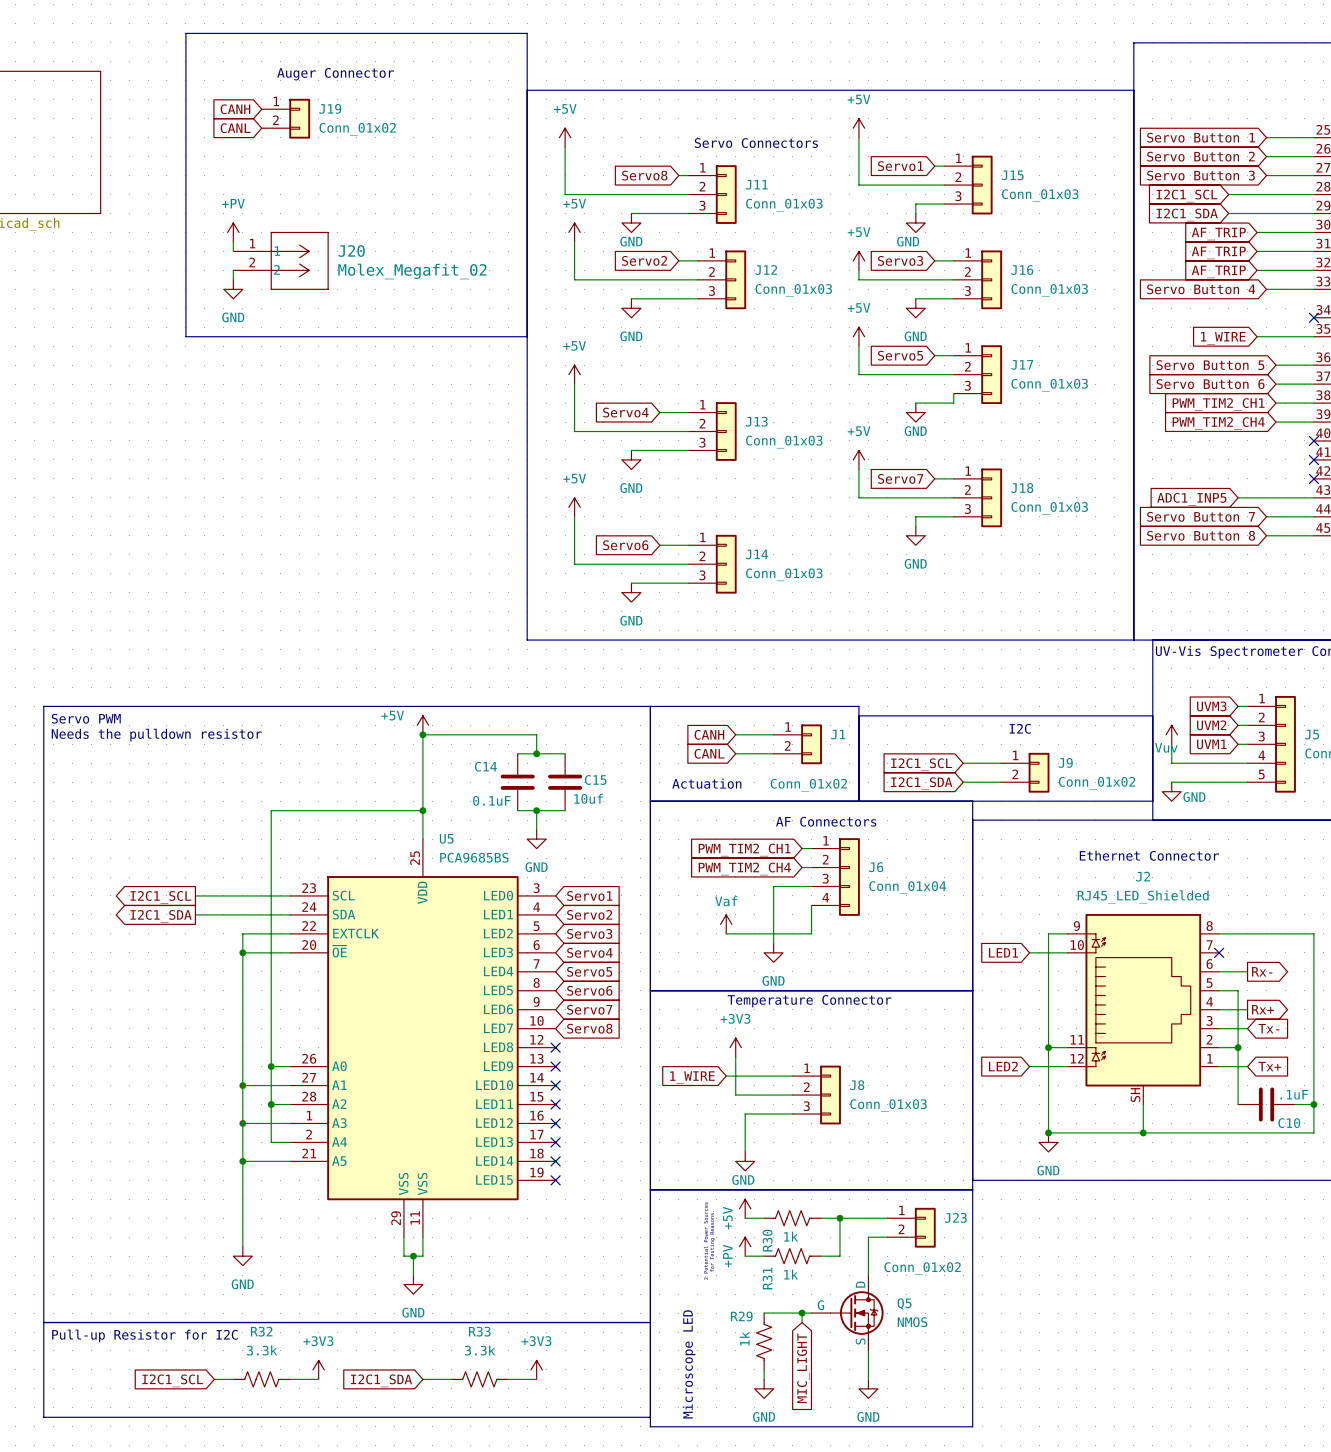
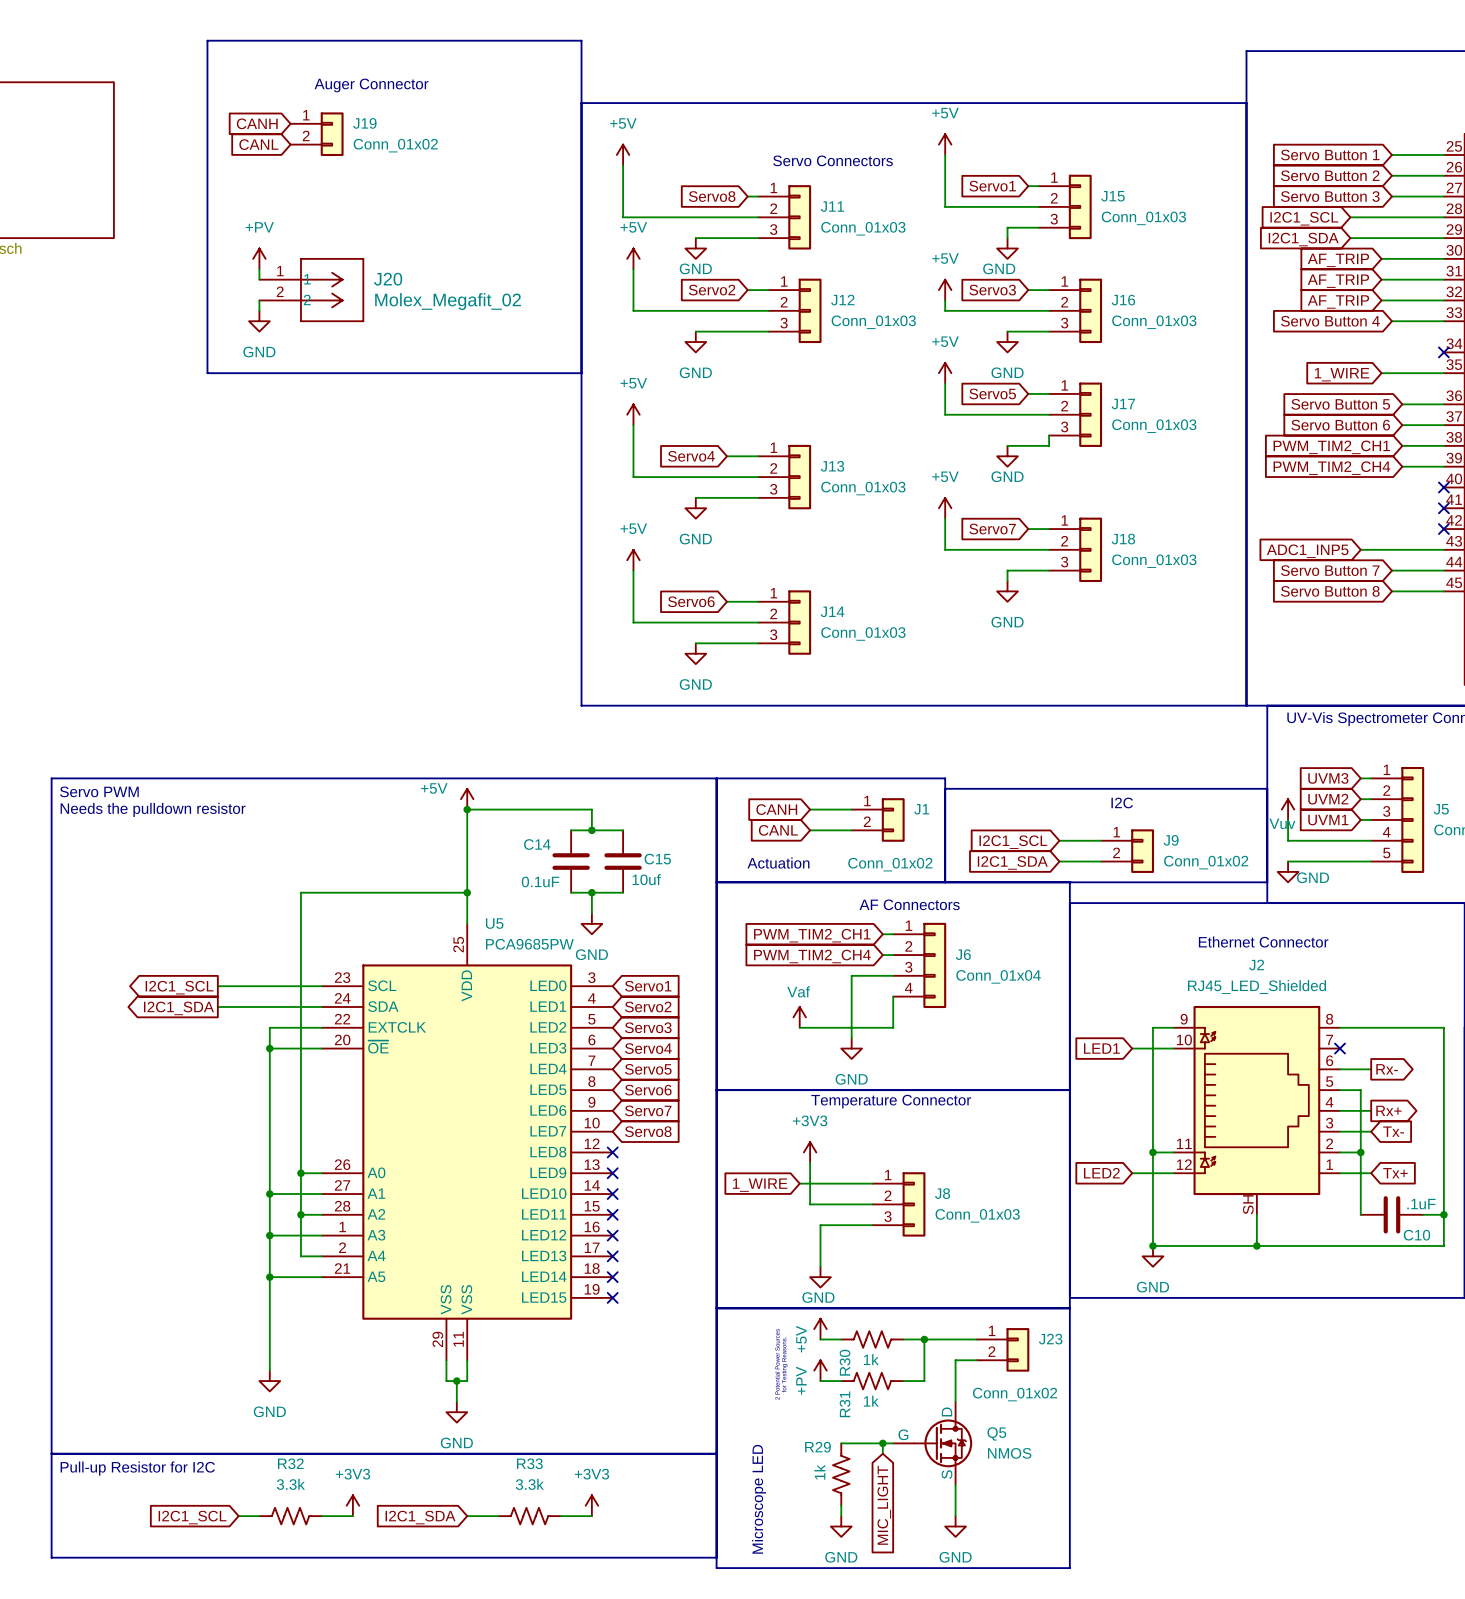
U5 value: PCA9685BS (474, 857) -> PCA9685PW (529, 944)

